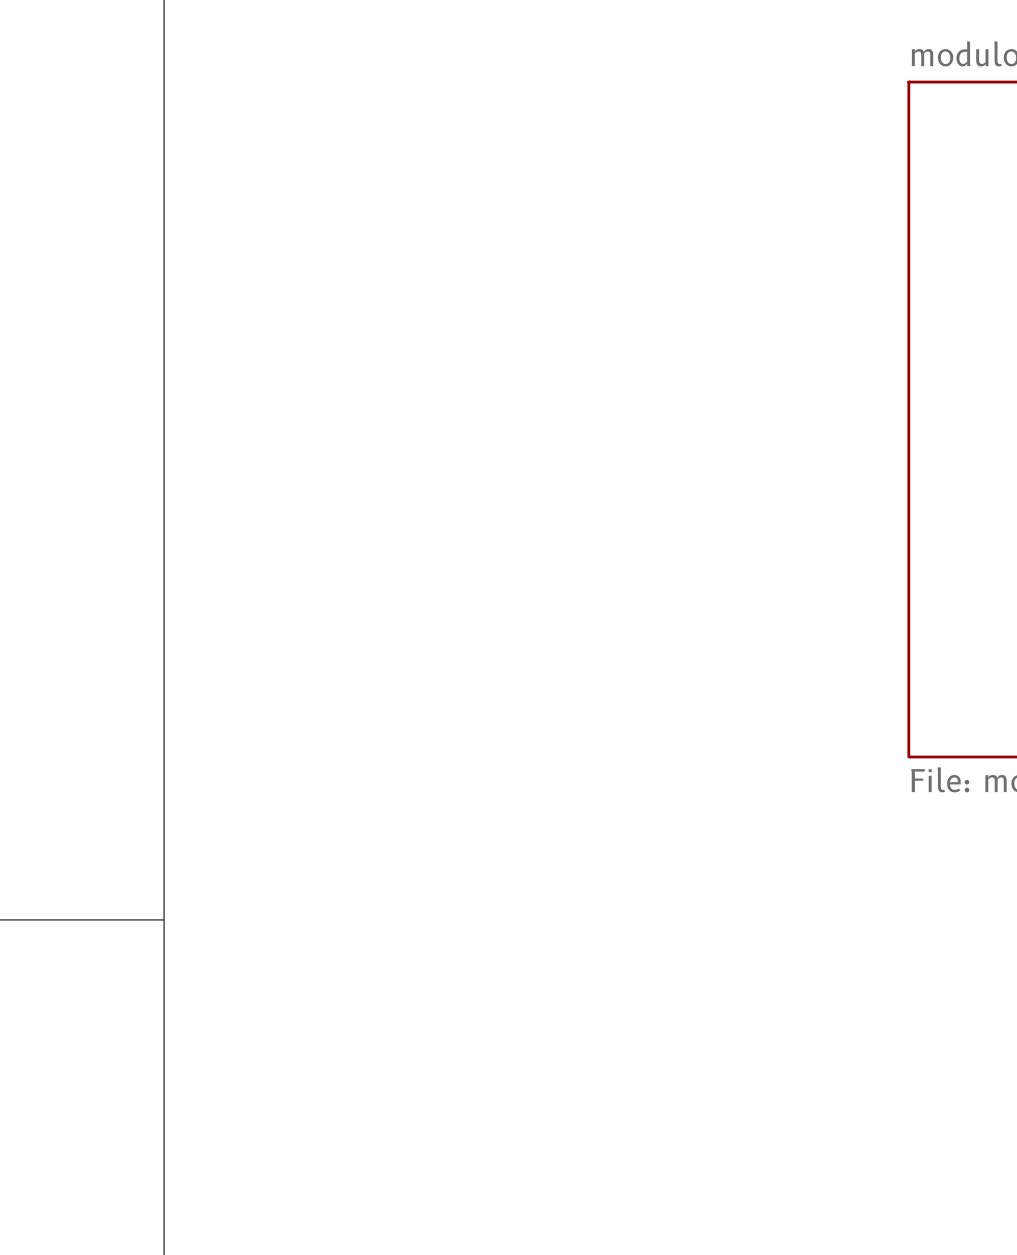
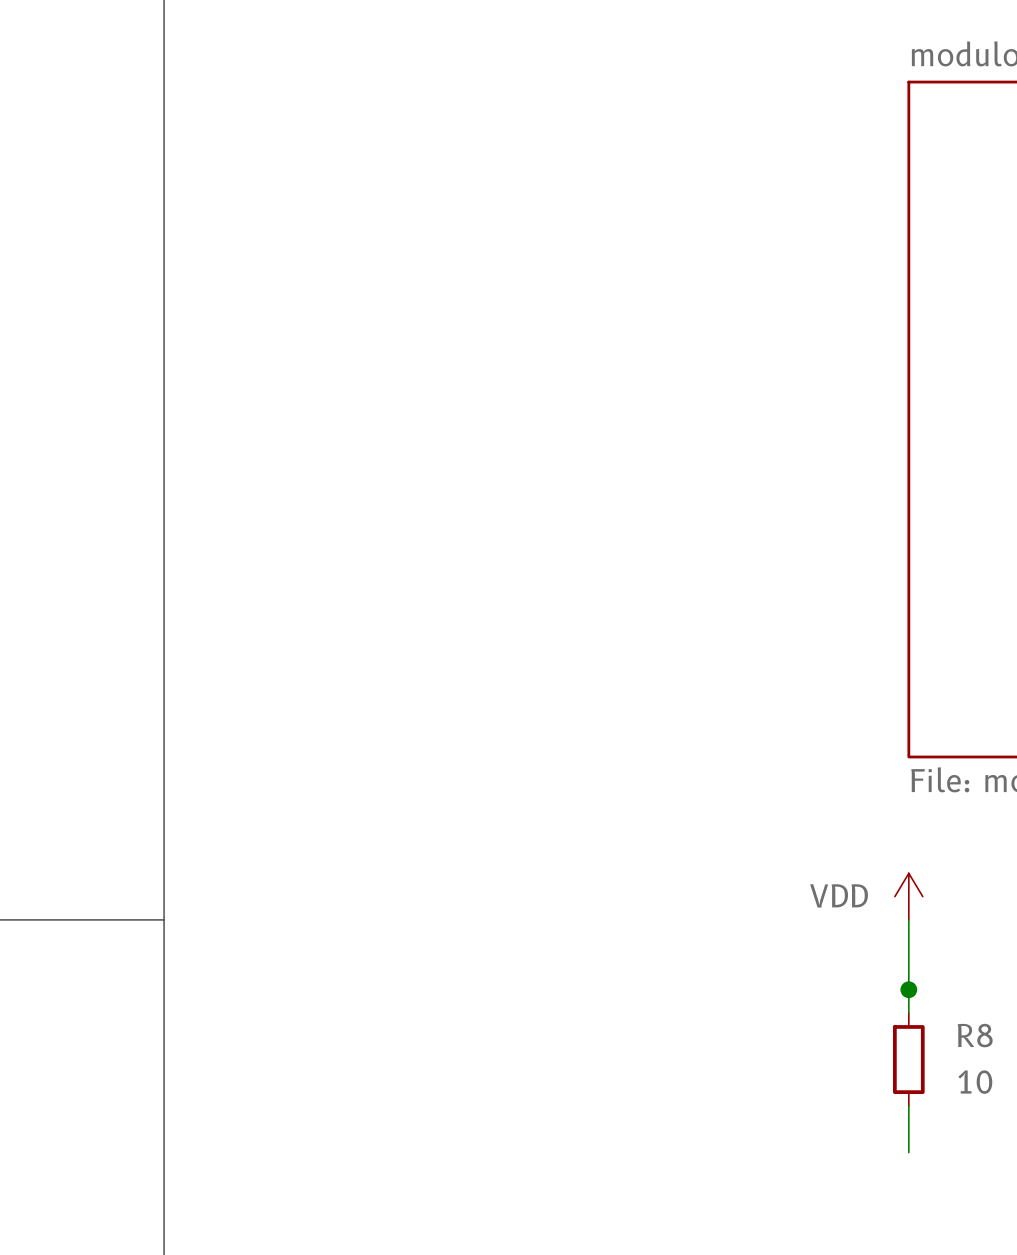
power symbol: none -> VDD (908, 896)
wire: none -> (908, 919) (908, 1013)
junction: none -> (908, 989)
R8: none -> 10 (908, 1059)
wire: none -> (908, 1106) (908, 1152)

